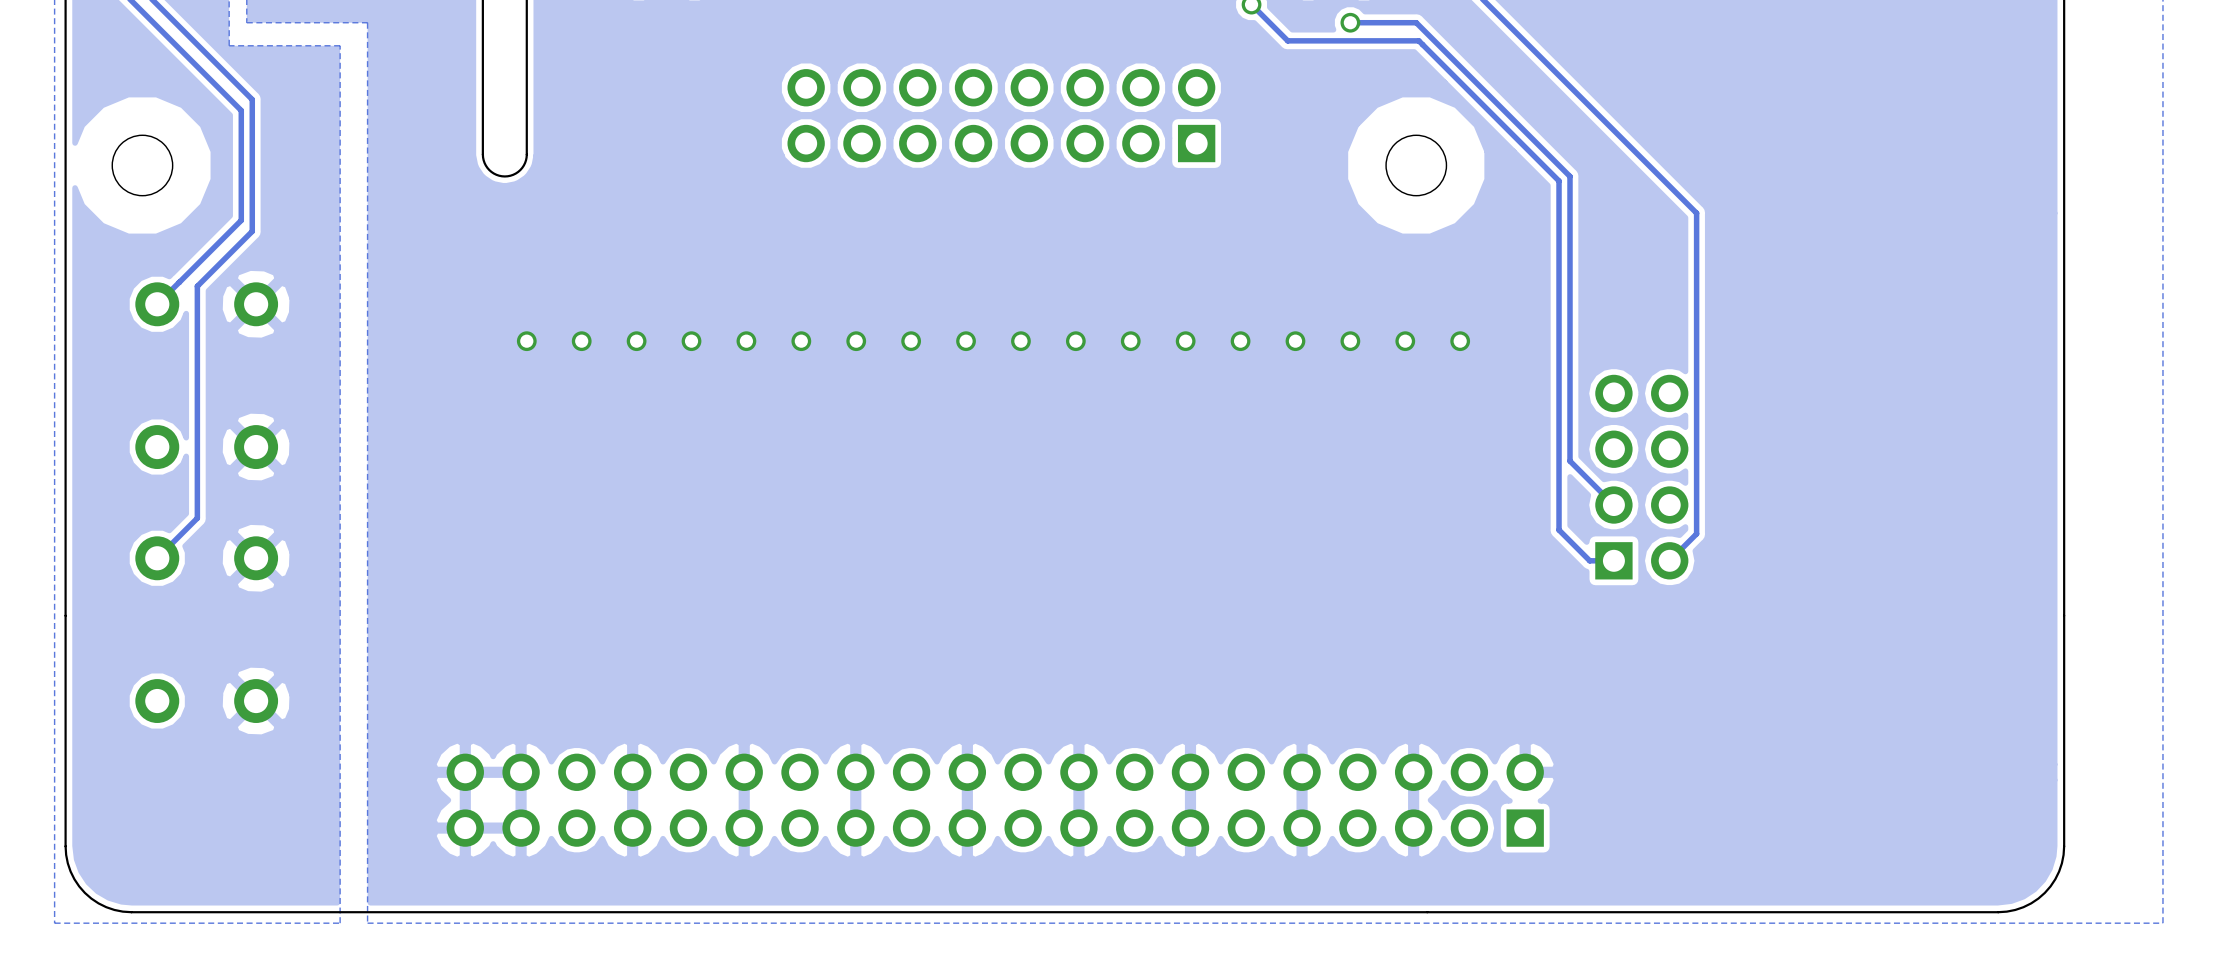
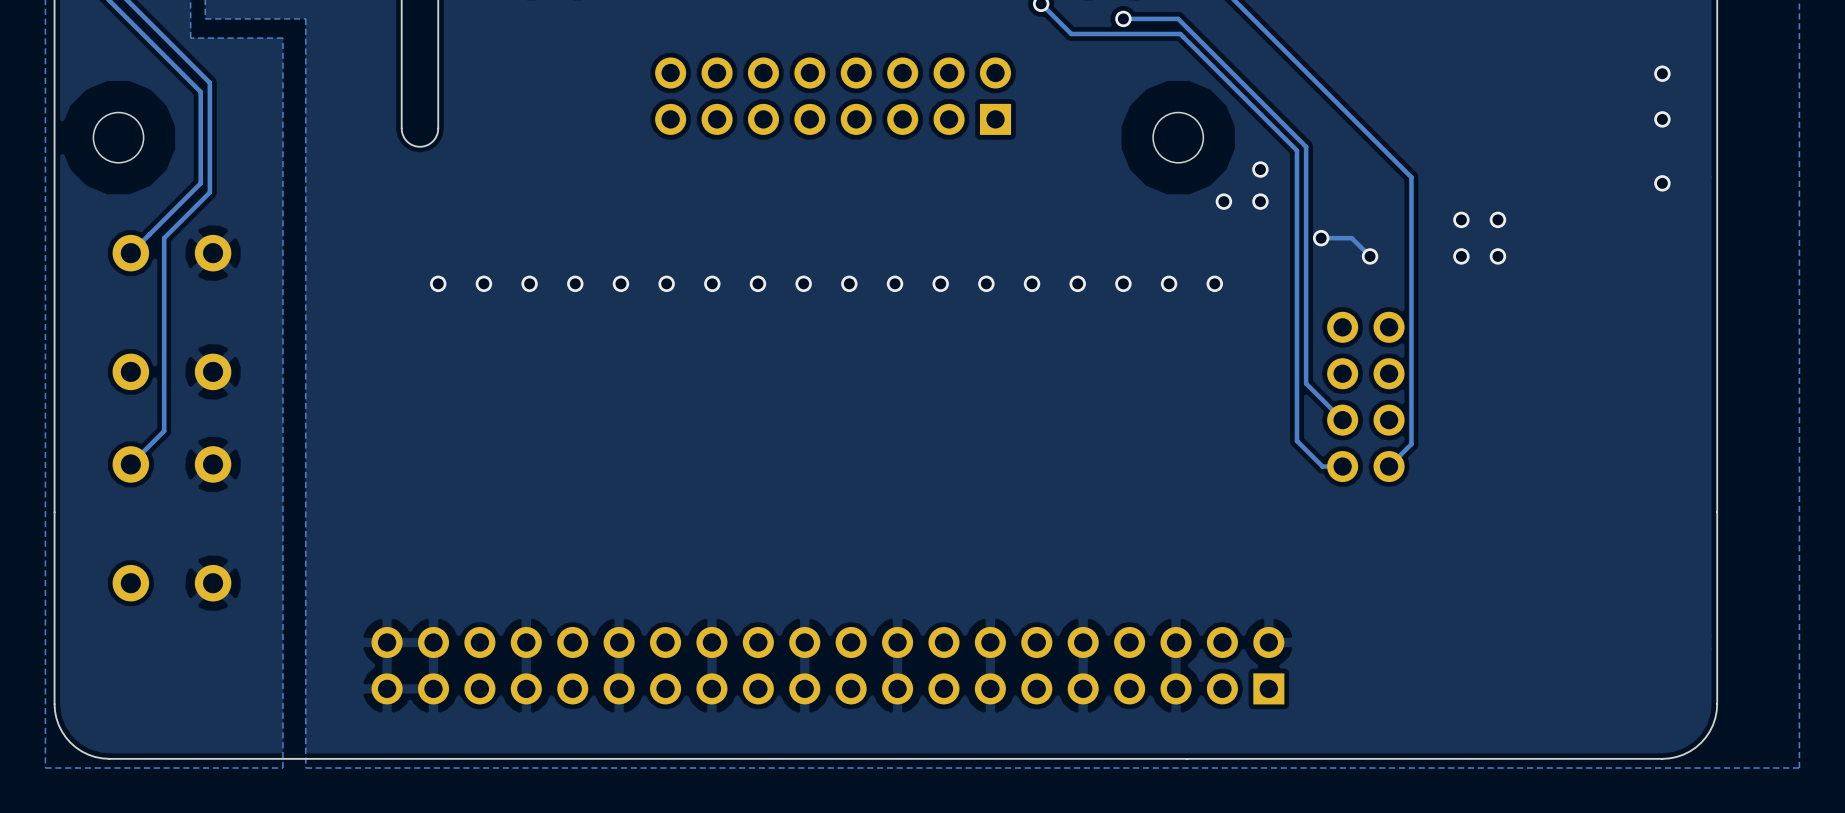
via: none -> (1662, 73)
via: none -> (1662, 119)
via: none -> (1260, 169)
via: none -> (1662, 183)
via: none -> (1223, 201)
via: none -> (1260, 201)
via: none -> (1461, 219)
via: none -> (1497, 219)
track: none -> (1321, 238) (1351, 238) (1370, 256)
via: none -> (1321, 238)
via: none -> (1370, 256)
via: none -> (1461, 256)
via: none -> (1497, 256)
part footprint: [1595, 374, 1689, 580] -> [1327, 311, 1405, 483]

